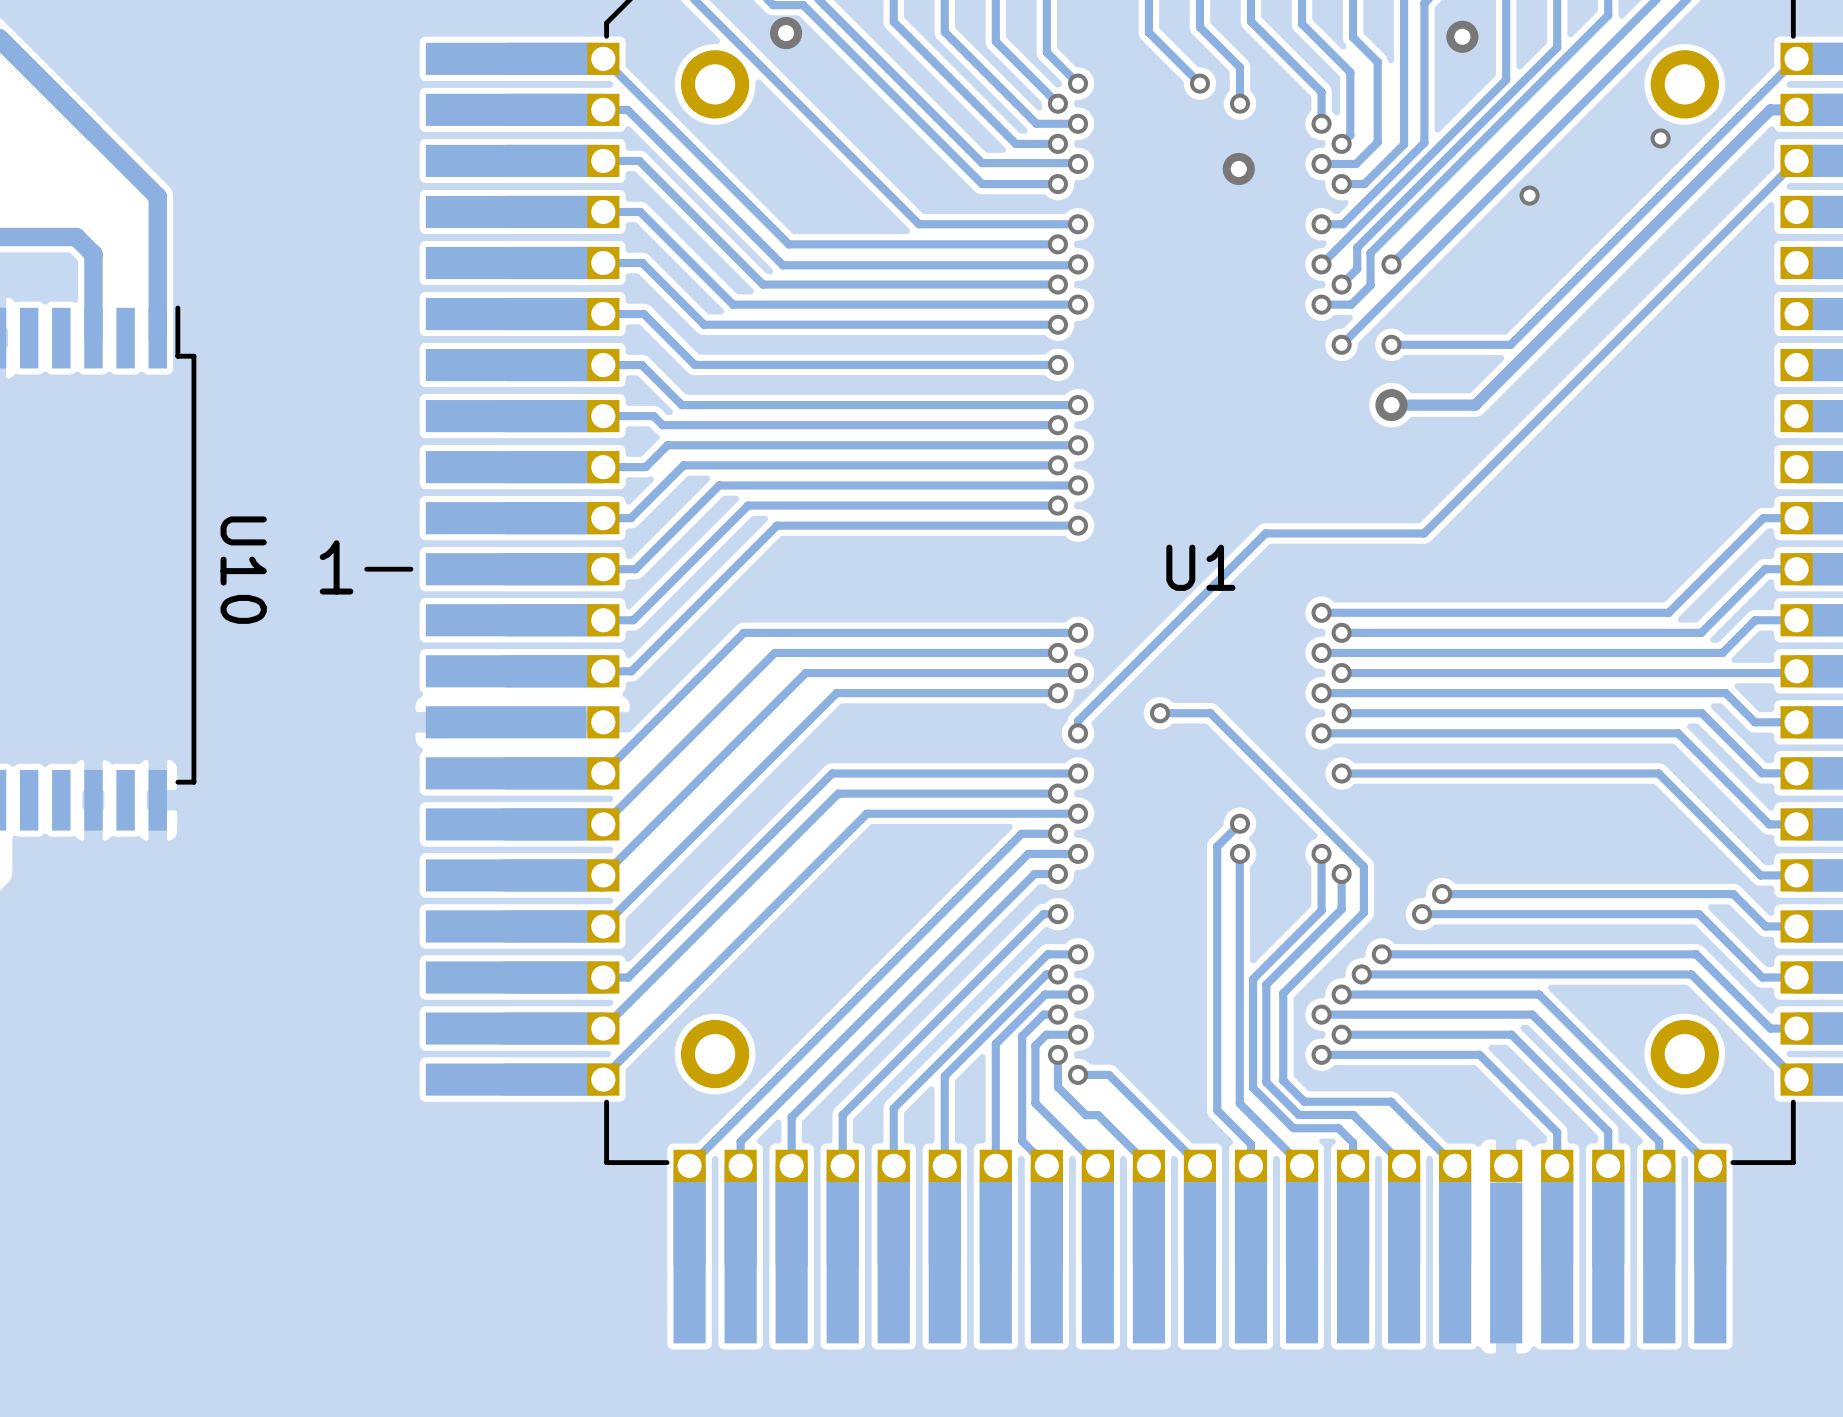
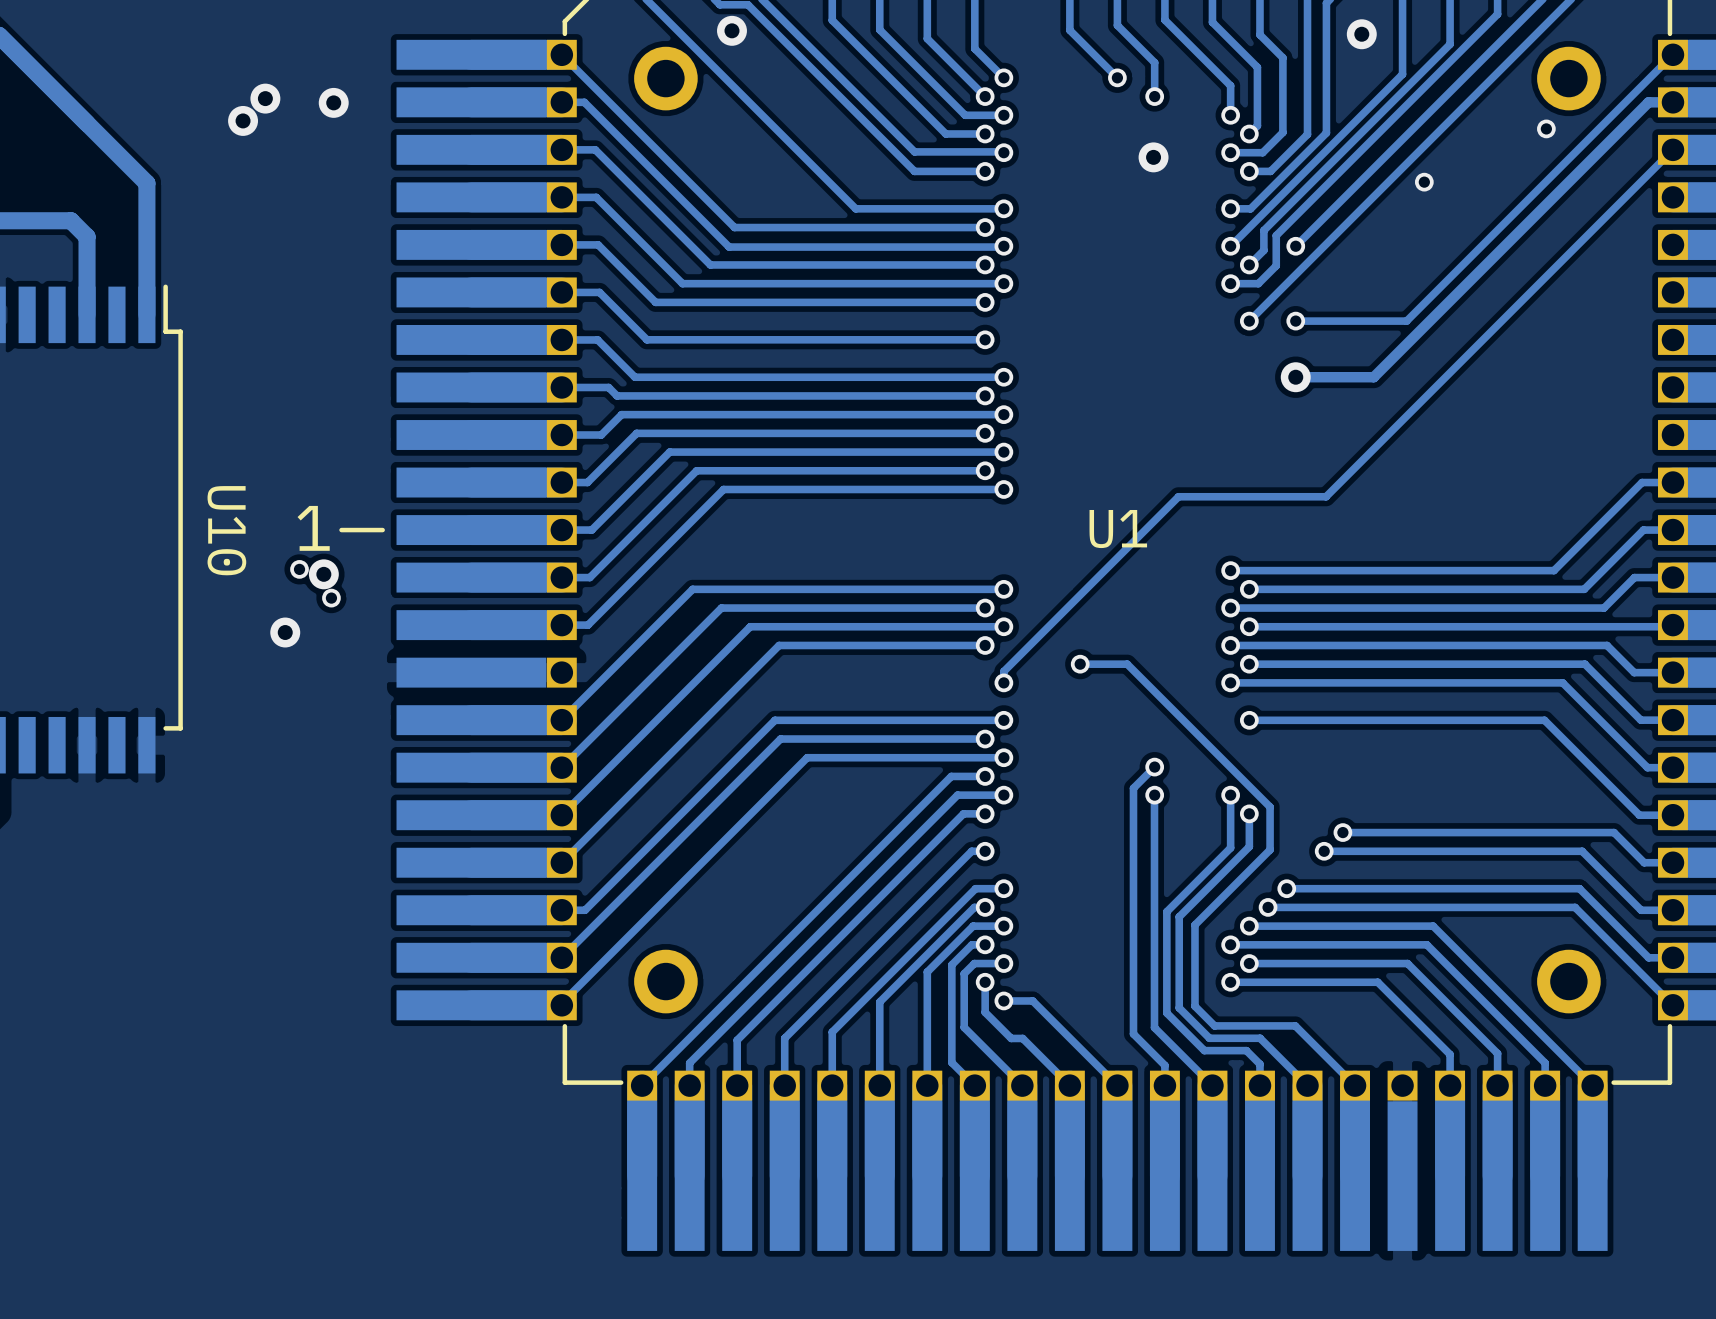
via: none -> (265, 98)
via: none -> (333, 102)
via: none -> (243, 120)
via: none -> (299, 569)
via: none -> (323, 574)
via: none -> (331, 598)
via: none -> (285, 632)

